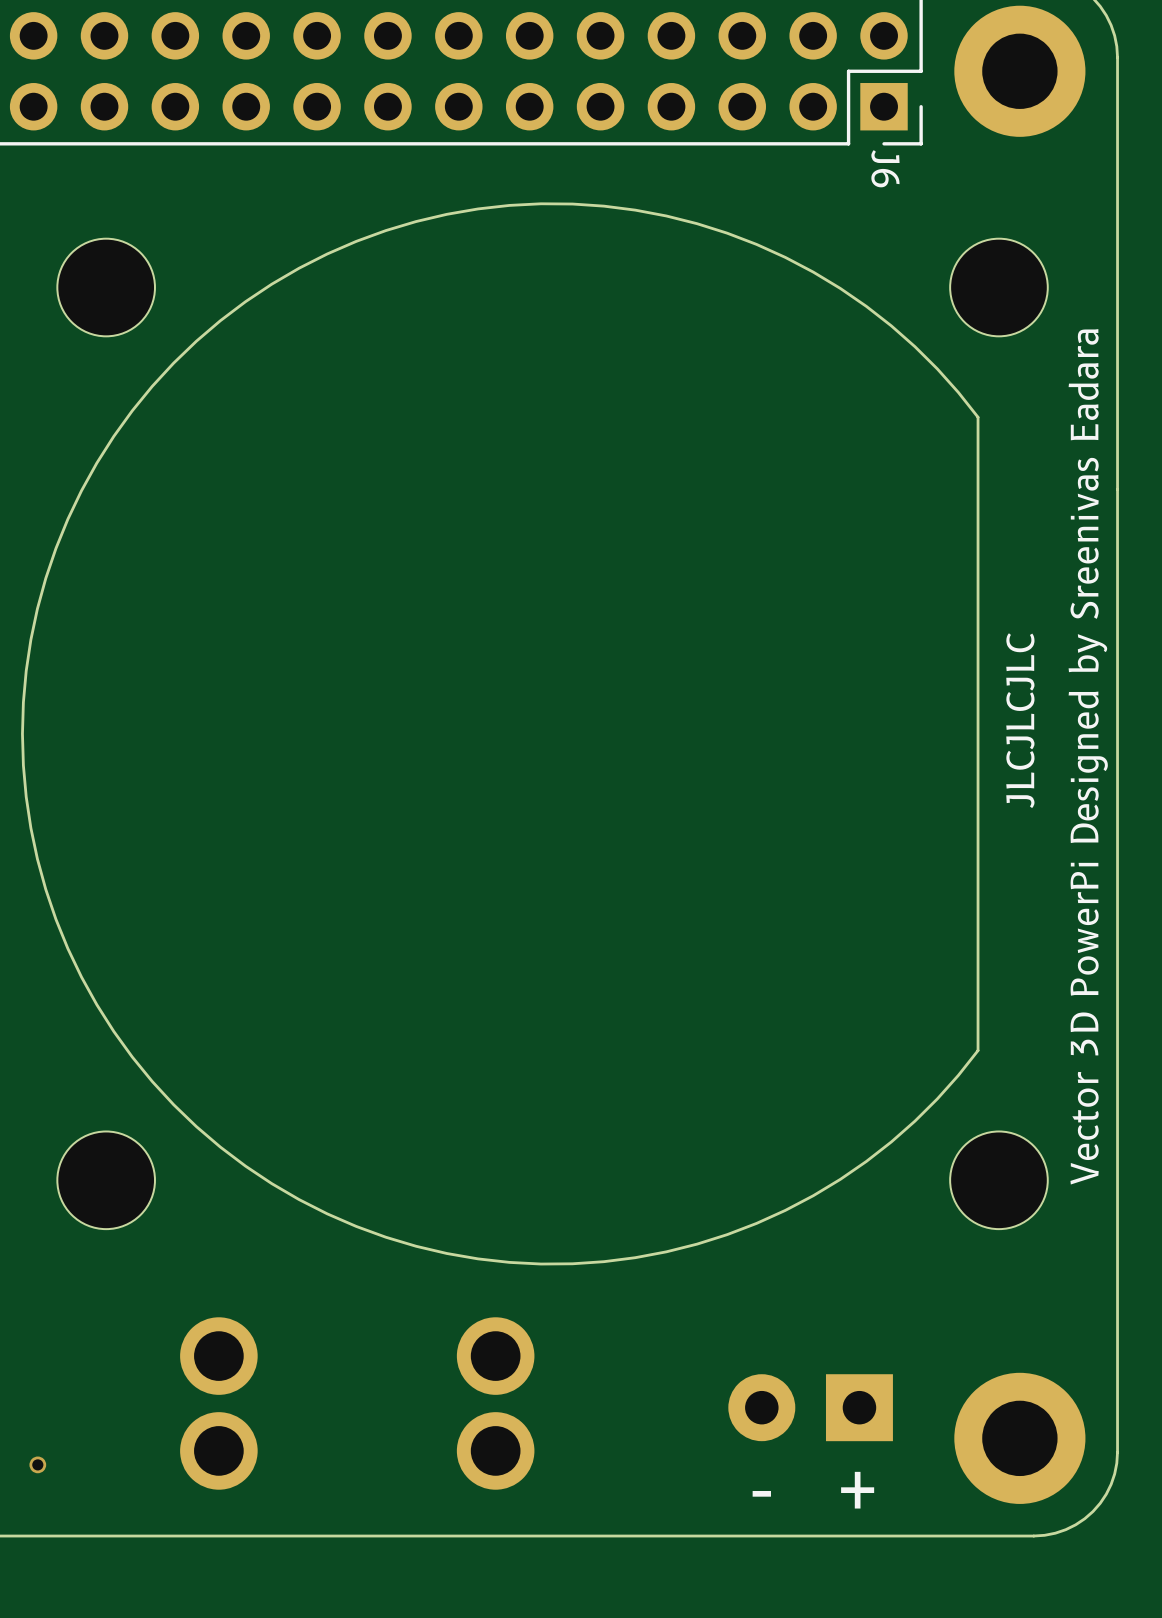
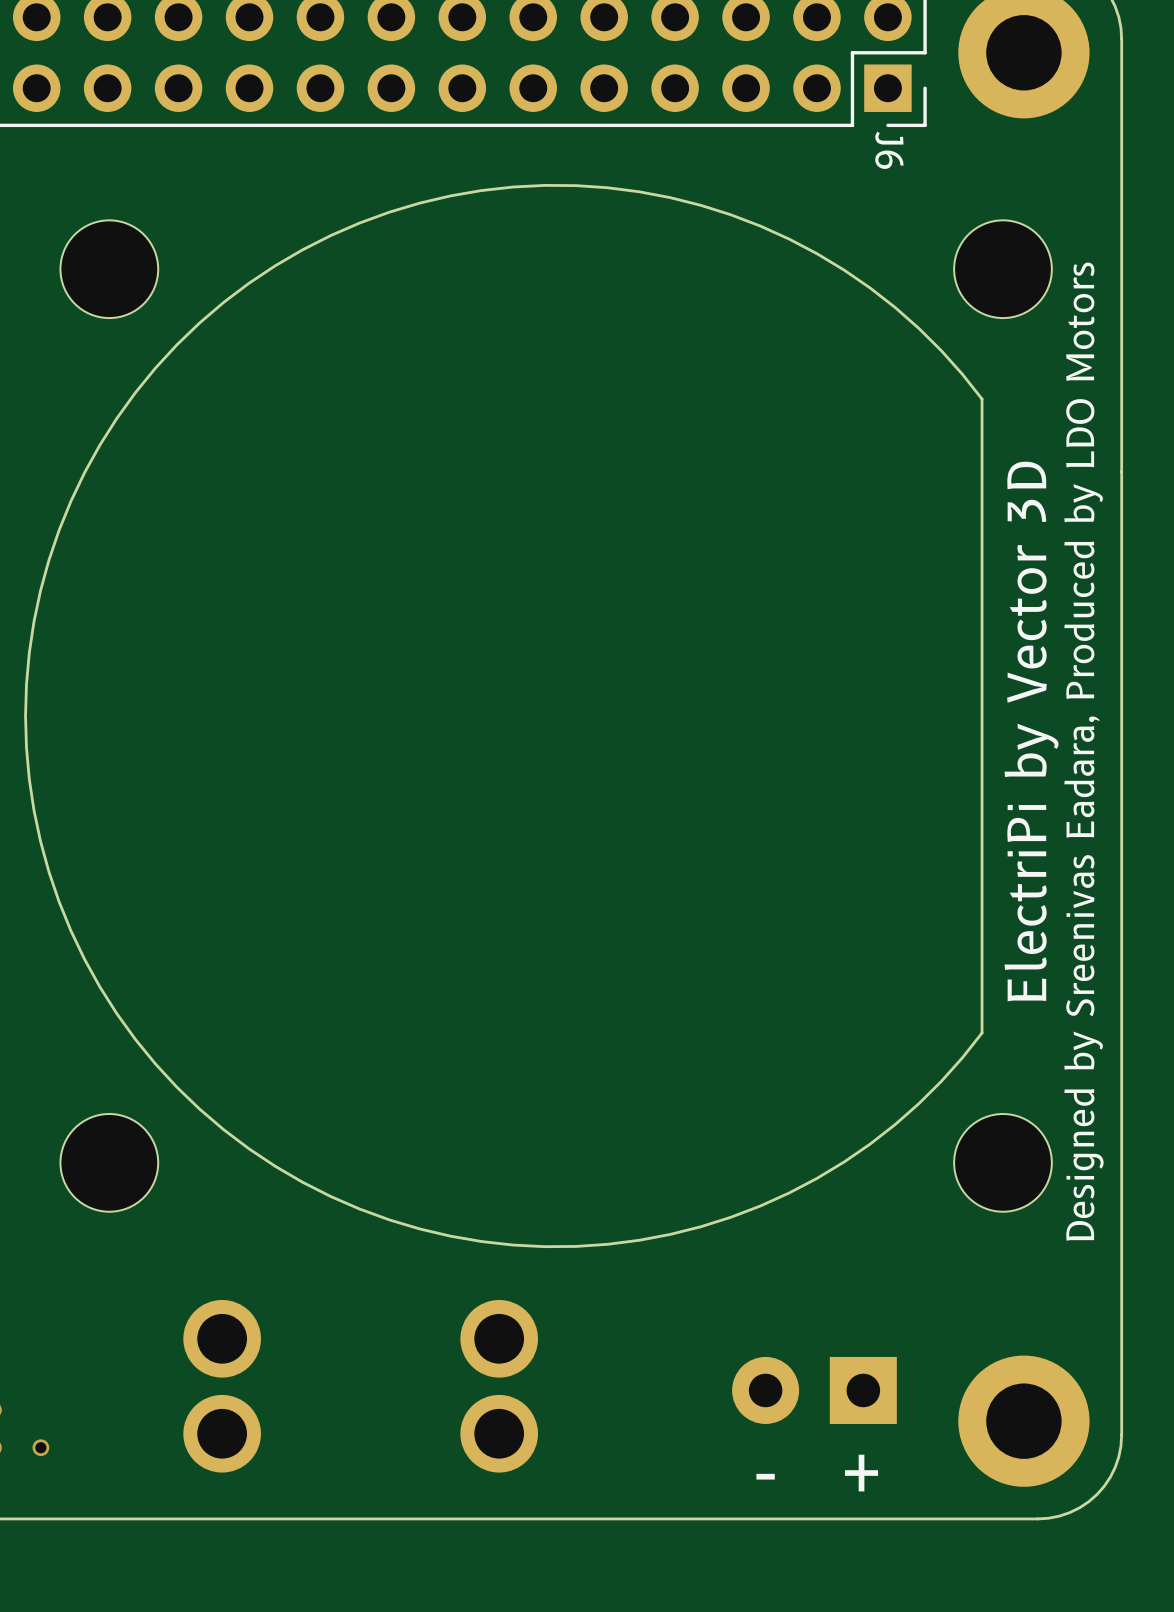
text: JLCJLCJLC (1020, 720) -> none
text: none -> ElectriPi by Vector 3D (1031, 731)
text: Vector 3D PowerPi Designed by Sreenivas Eadara (1088, 756) -> Designed by Sreenivas Eadara, Produced by LDO Motors (1083, 751)

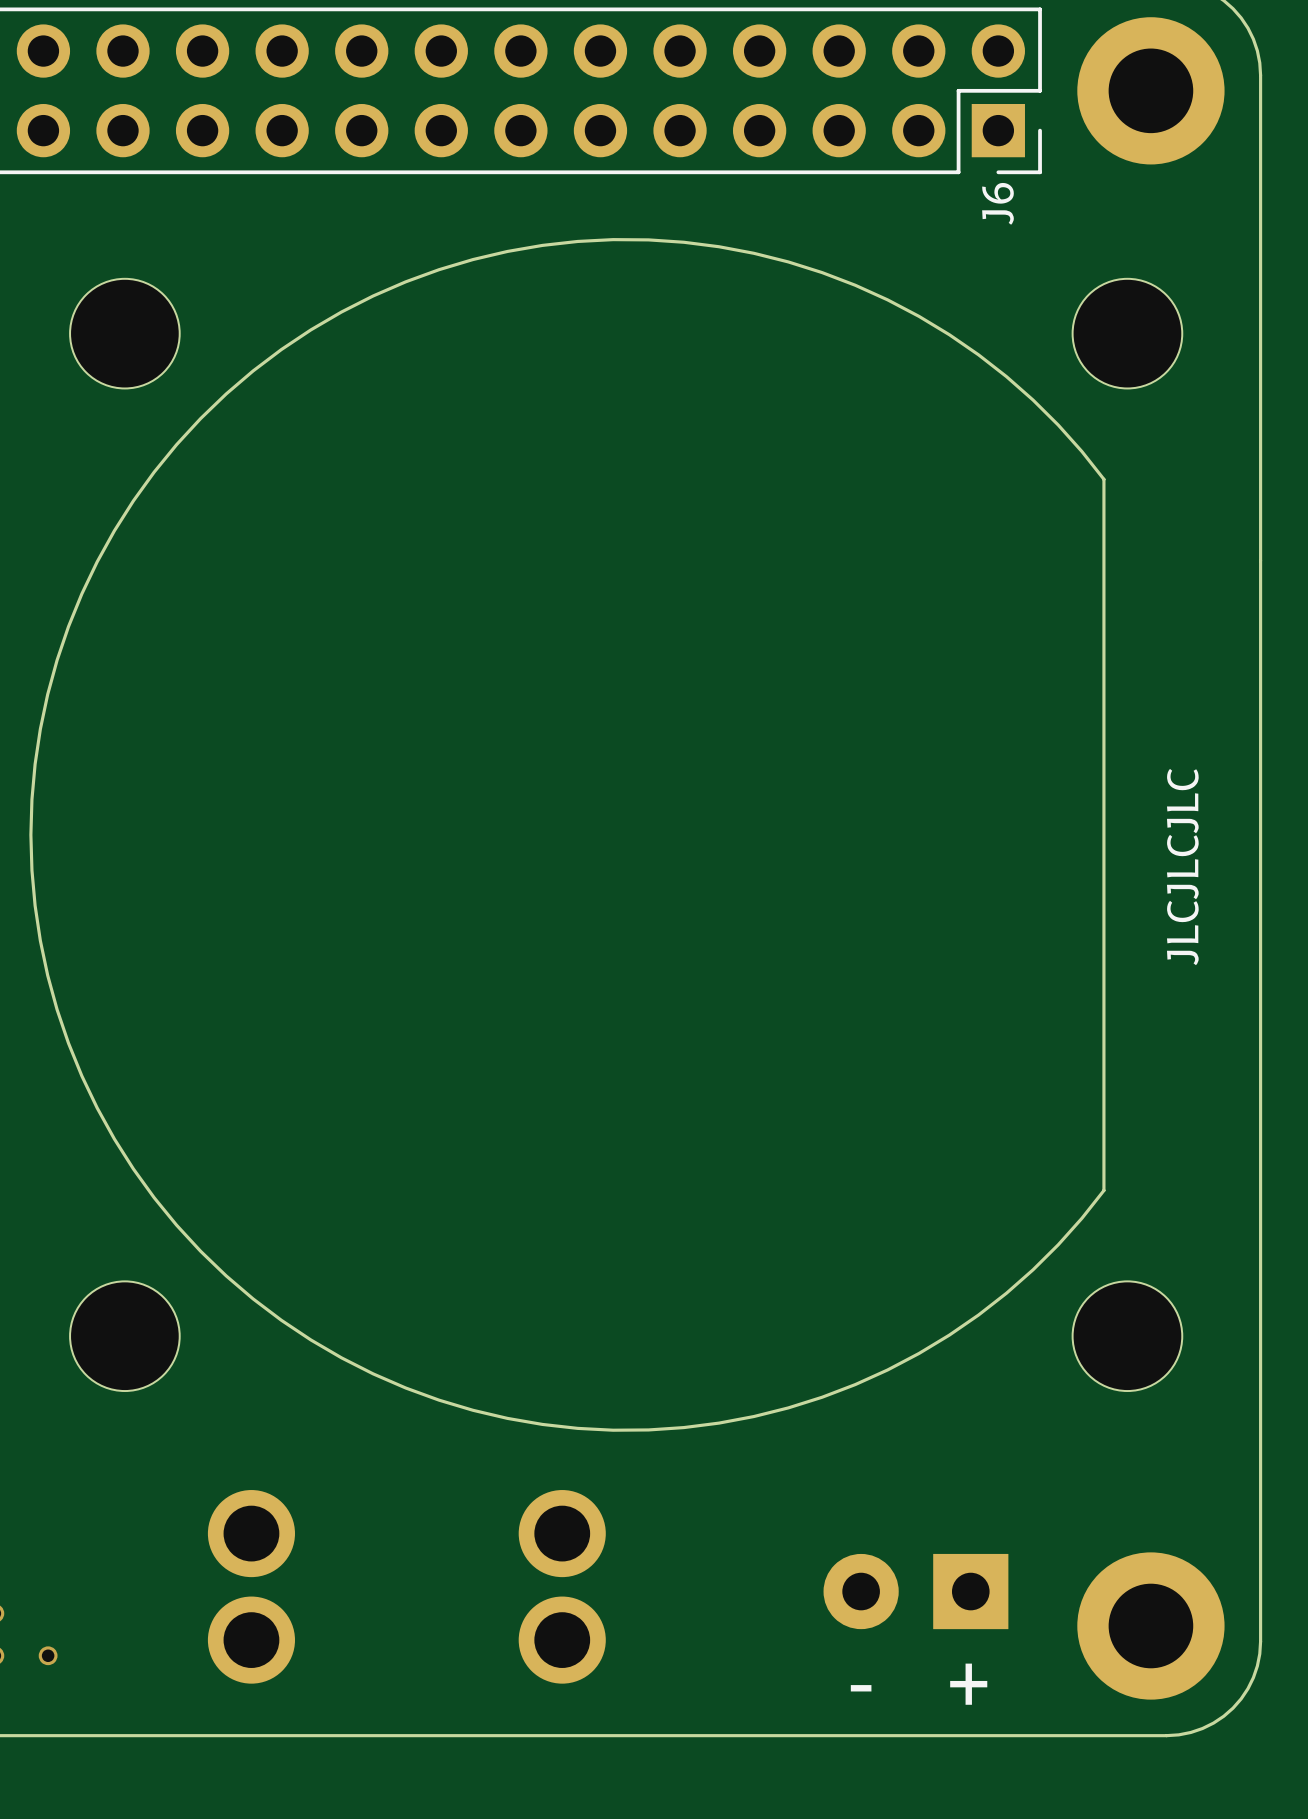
J6 name rotation: 0° (889, 150) -> 180° (997, 203)
text: ElectriPi by Vector 3D (1031, 731) -> none
text: none -> JLCJLCJLC (1182, 867)
text: Designed by Sreenivas Eadara, Produced by LDO Motors (1083, 751) -> none

